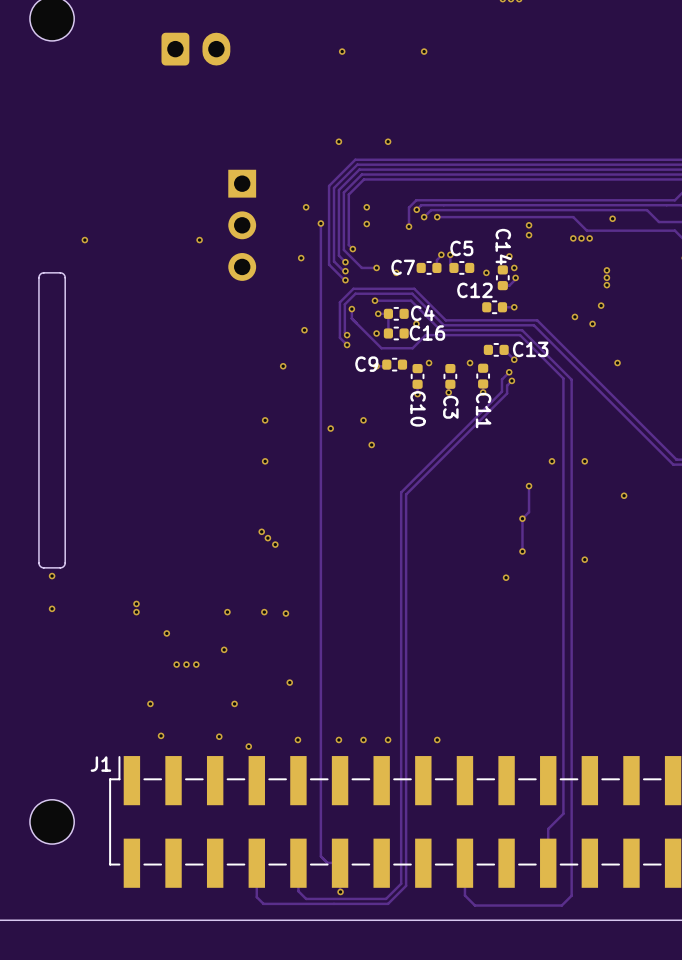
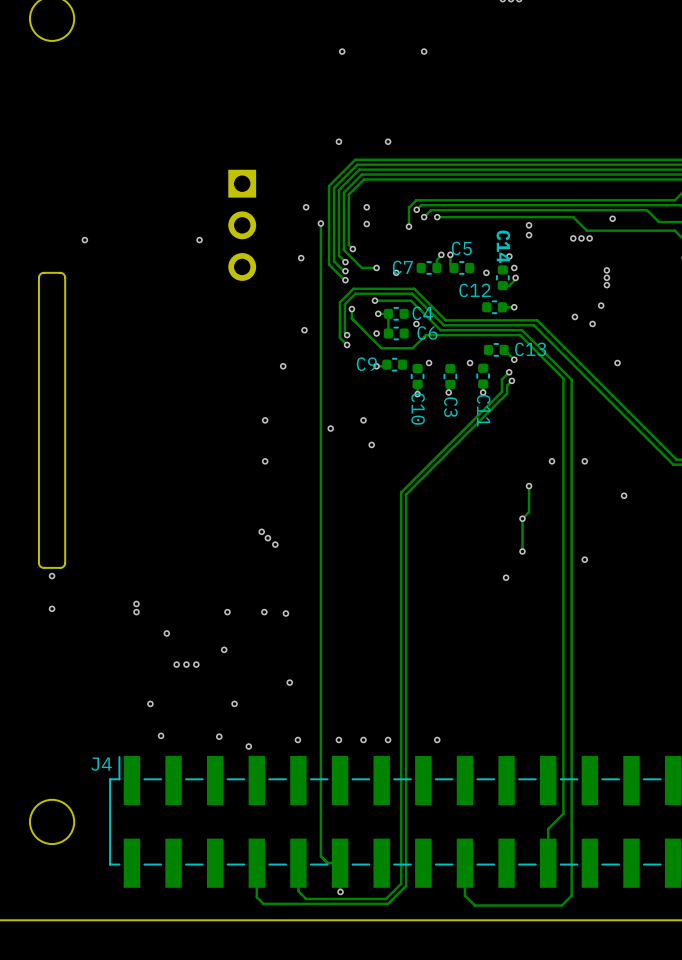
part: (195, 49) -> none
C16 name: C16 (427, 333) -> C6 (427, 333)
J1 name: J1 (100, 764) -> J4 (101, 764)

